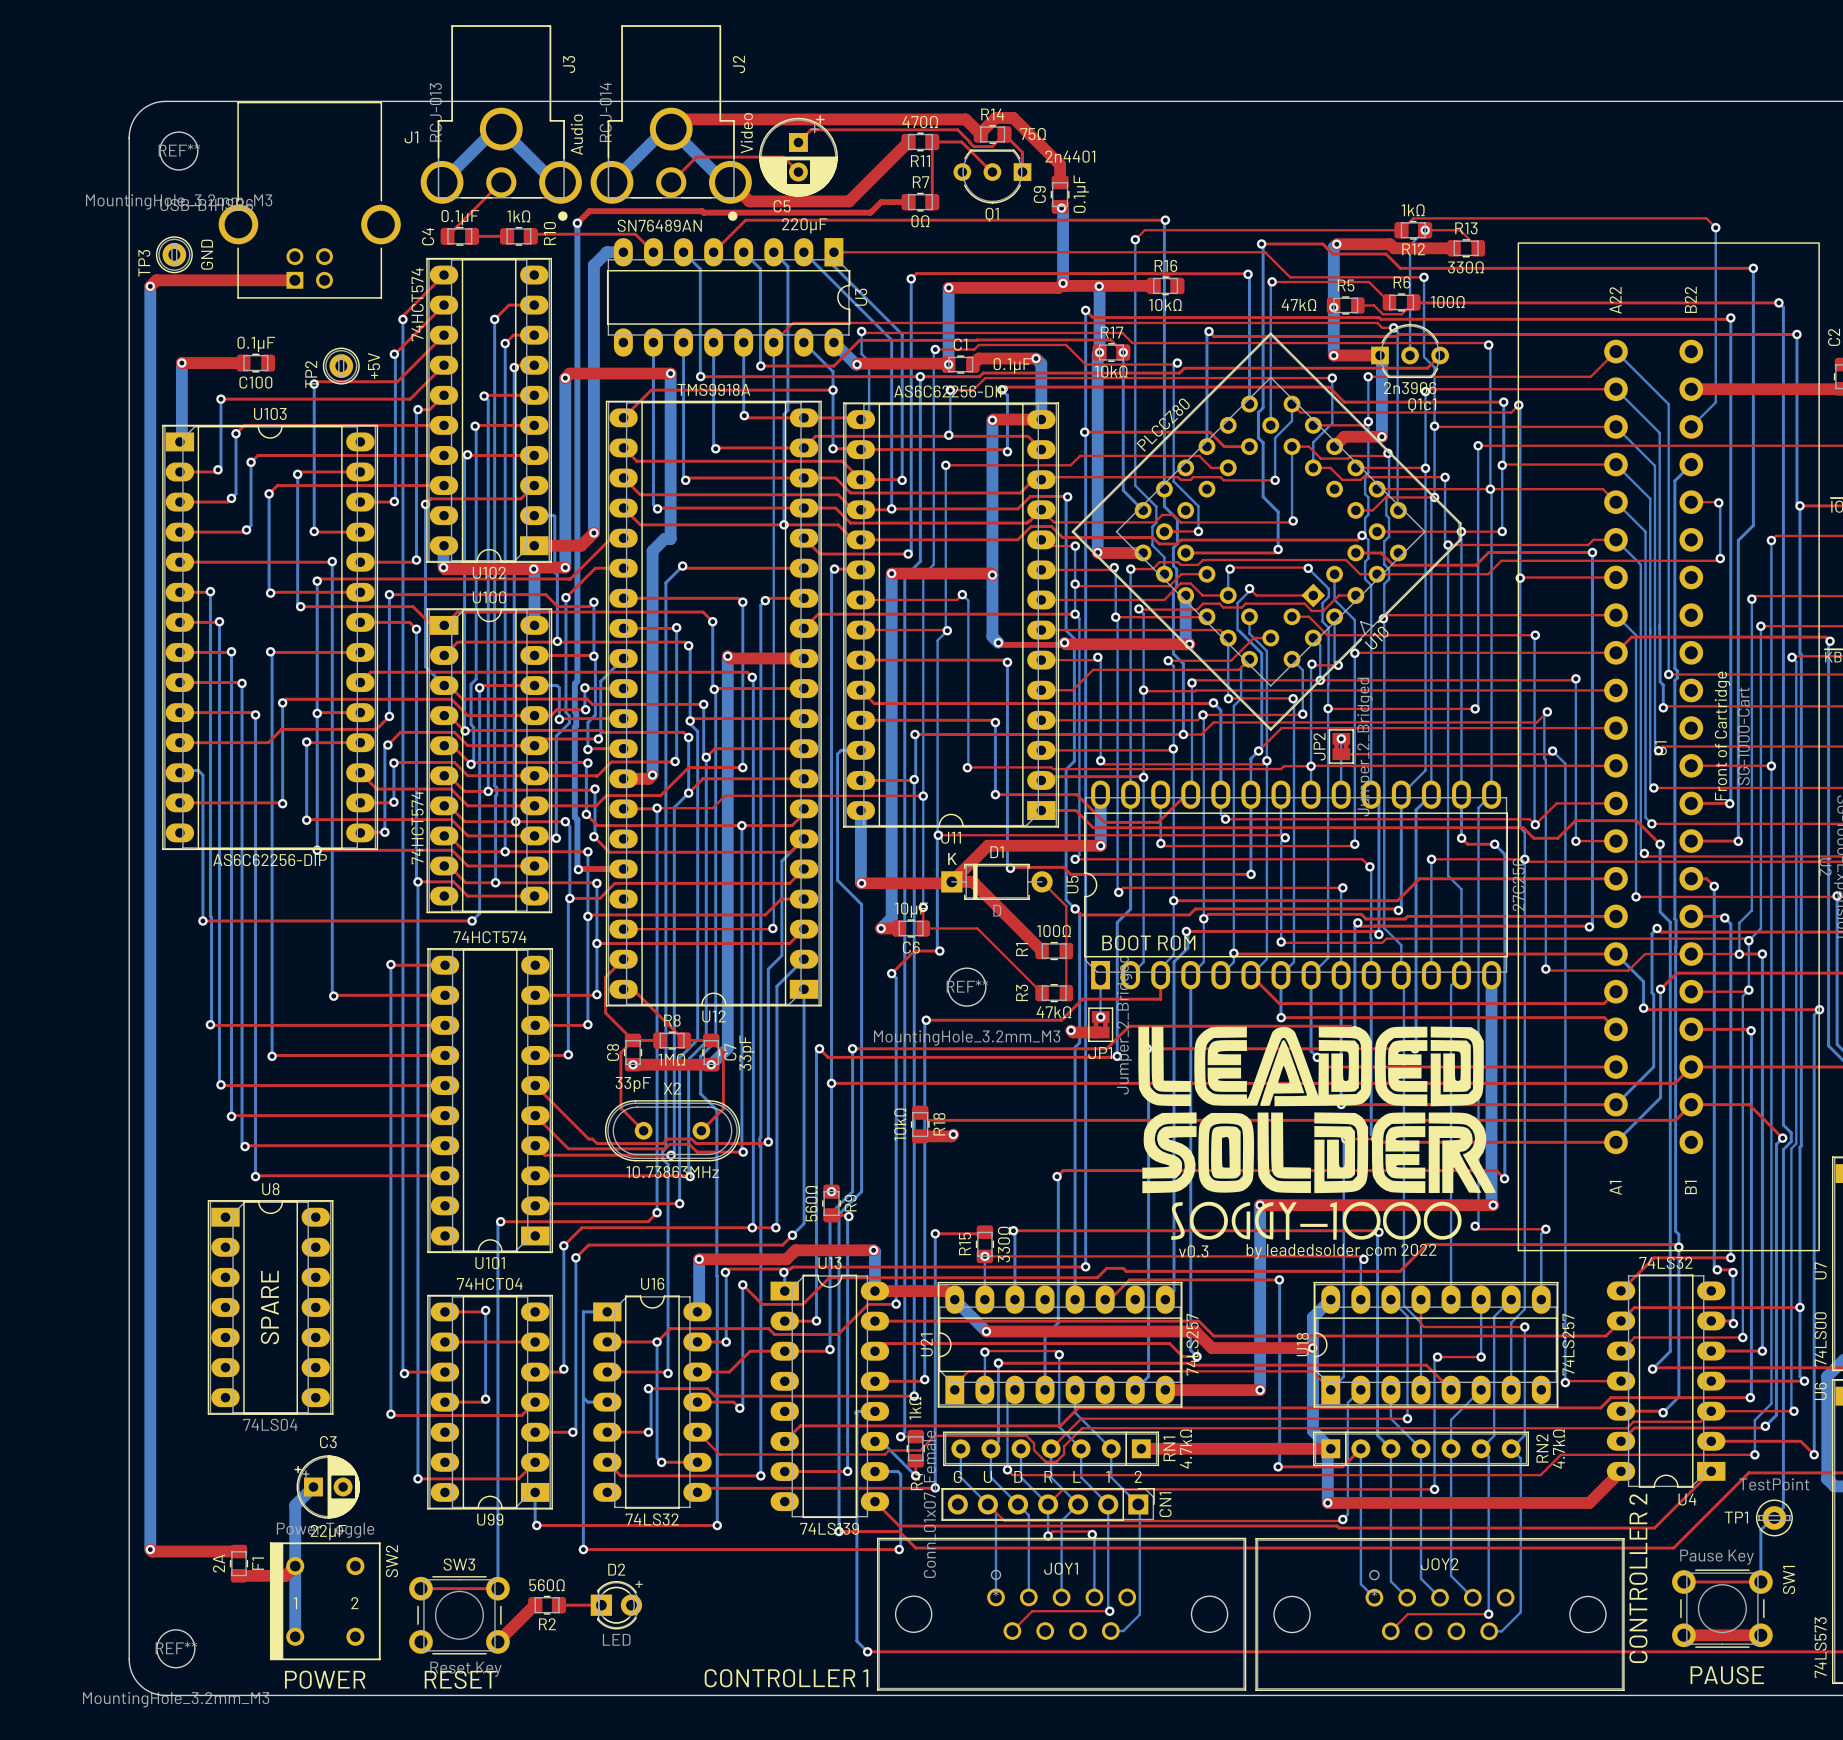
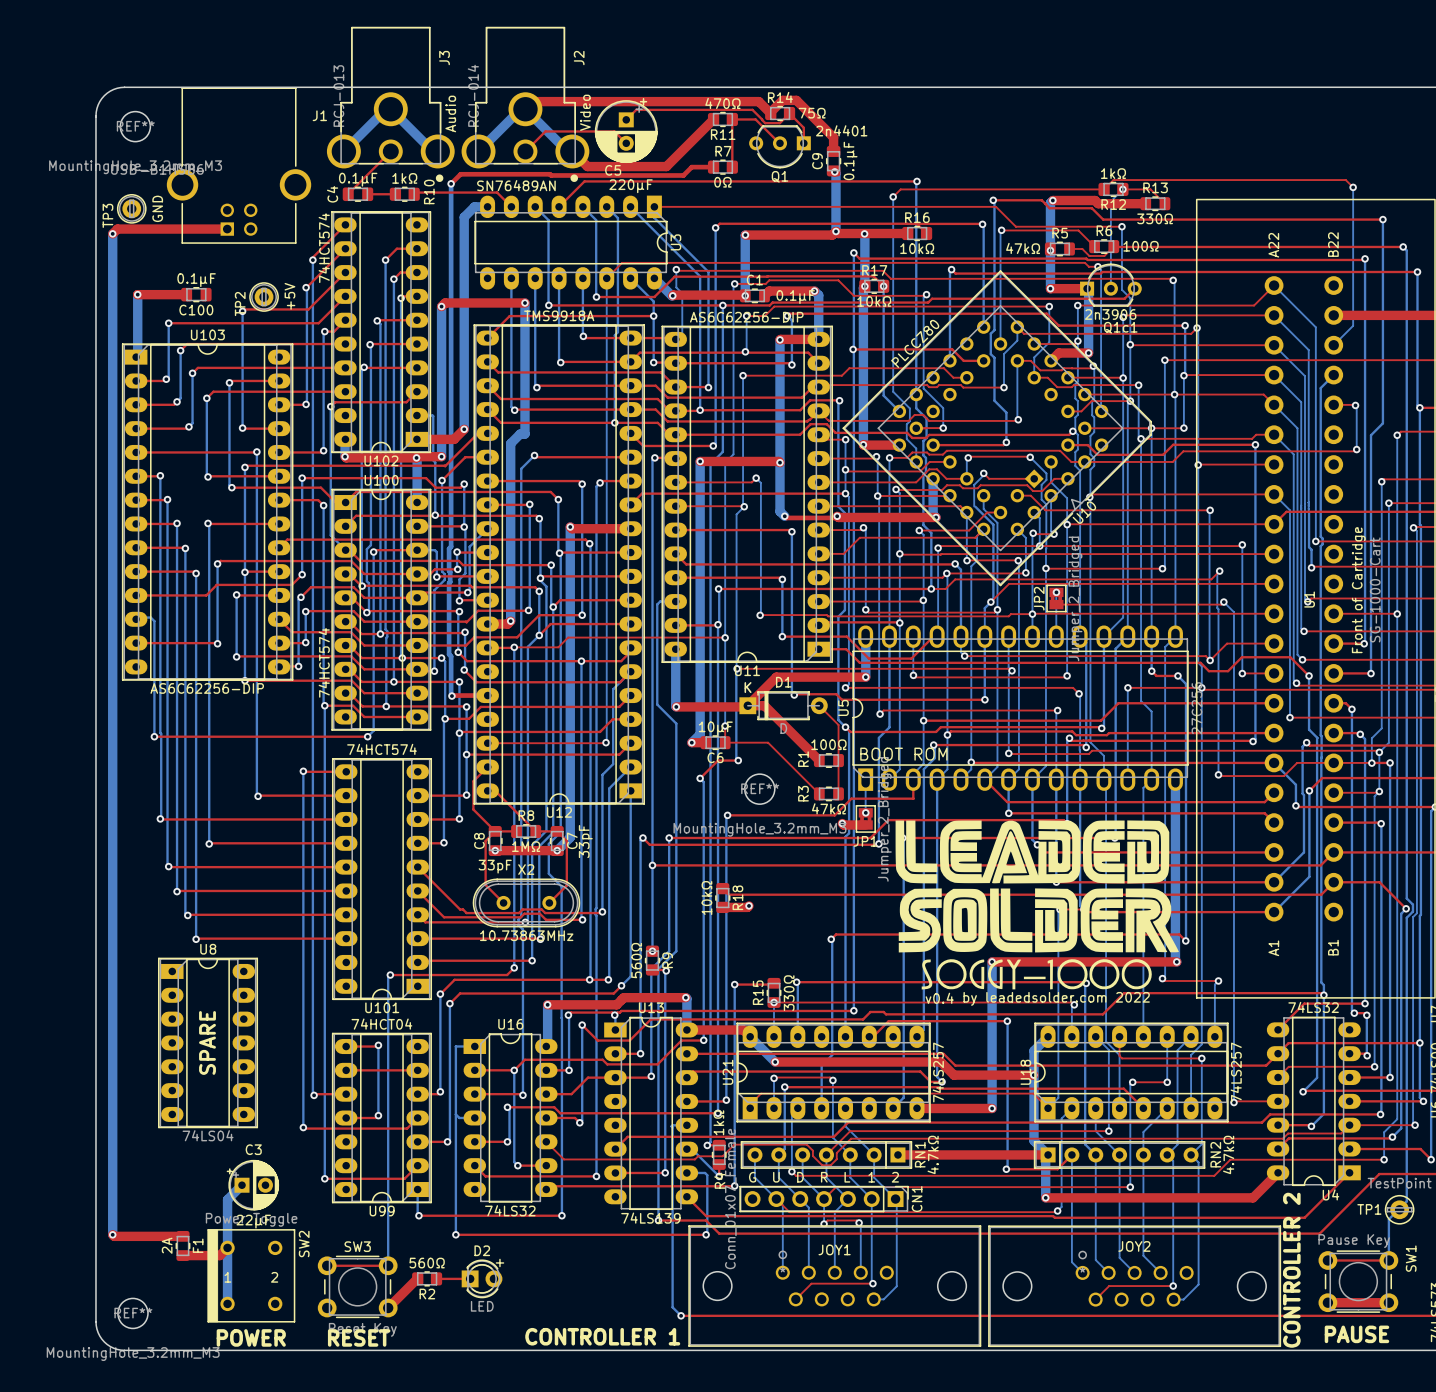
text: v0.3 (1193, 1251) -> v0.4 (939, 998)

